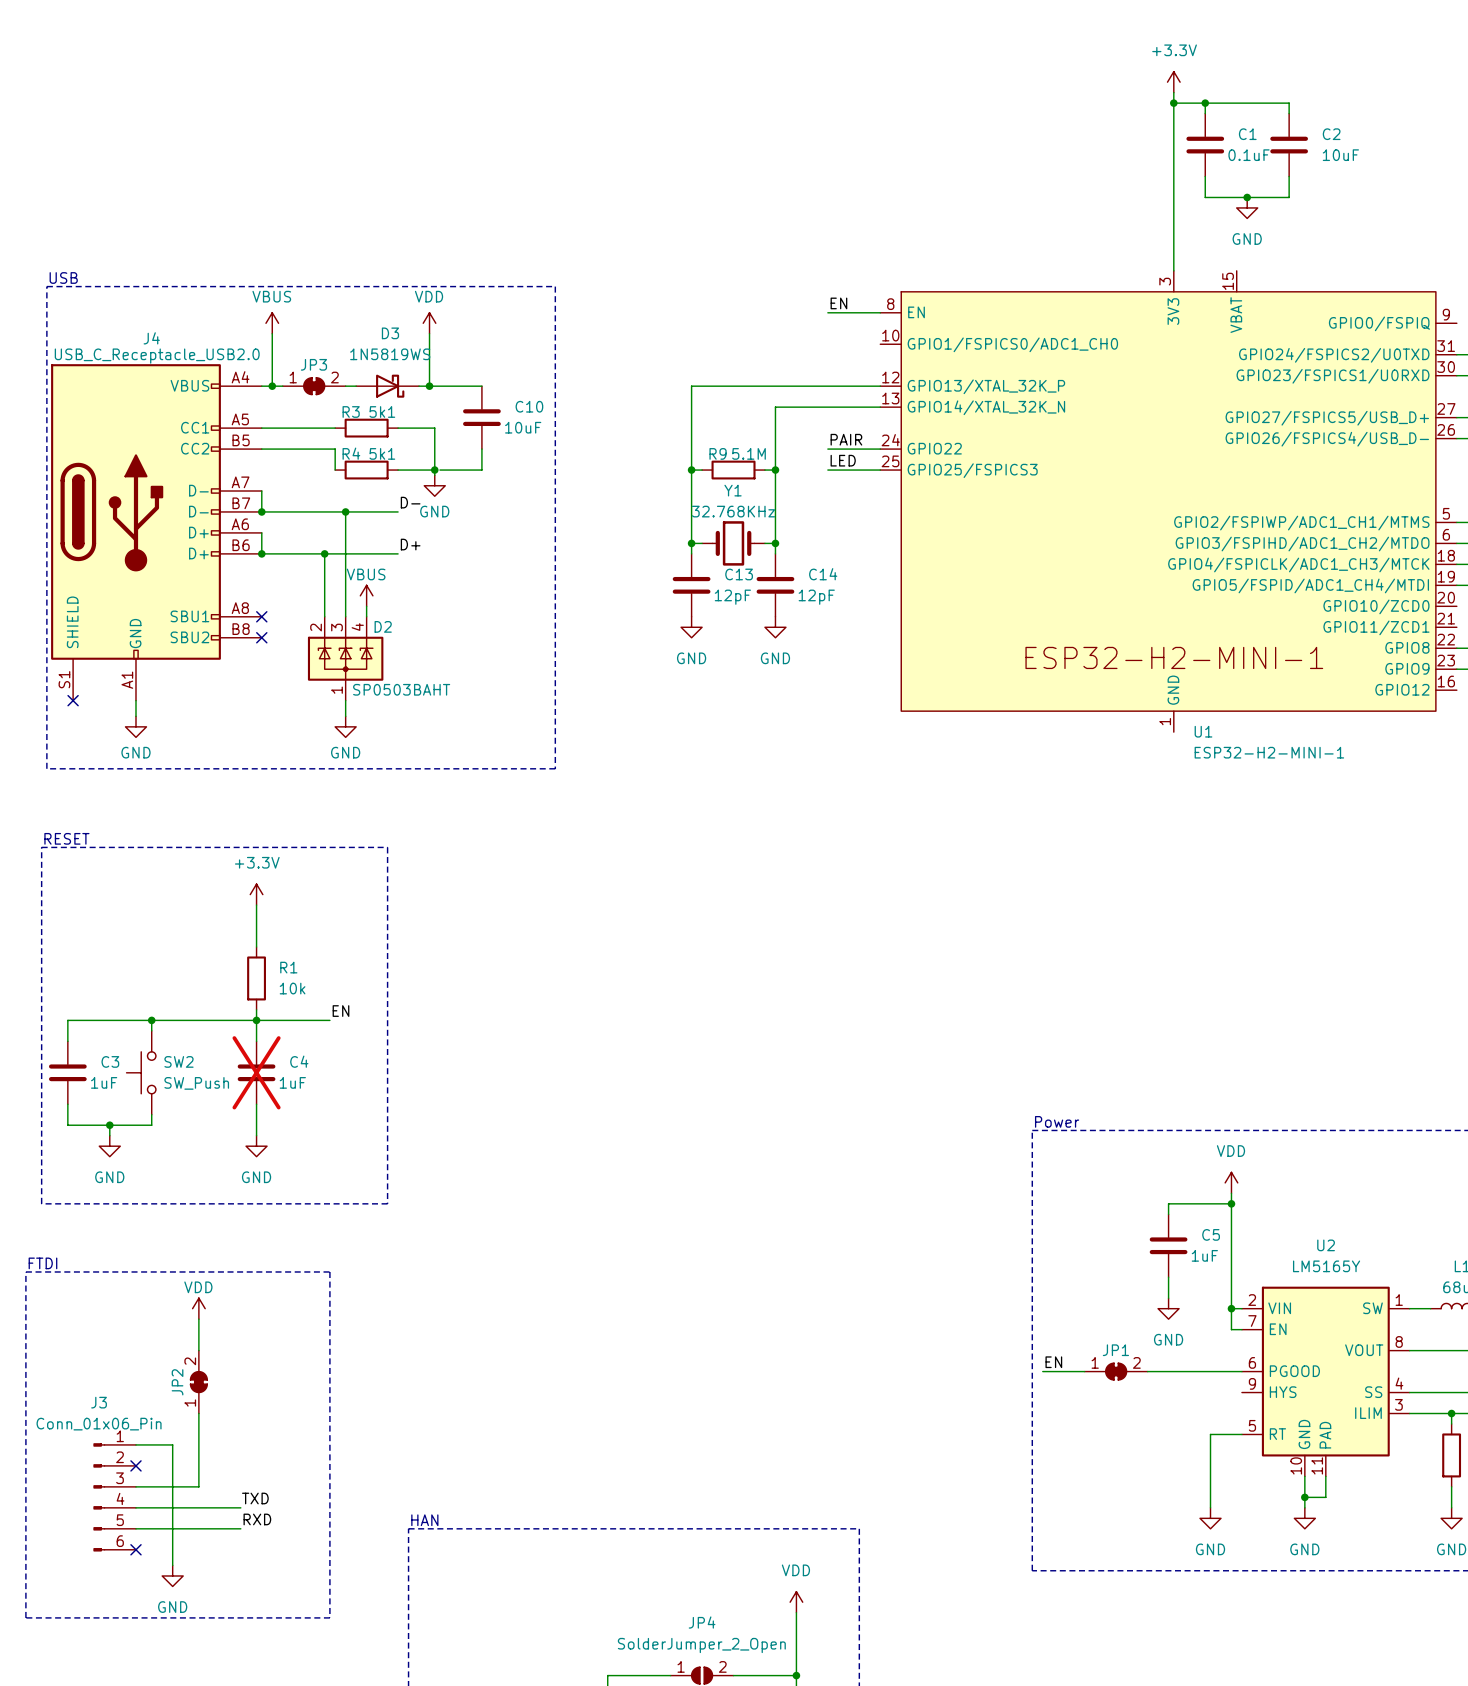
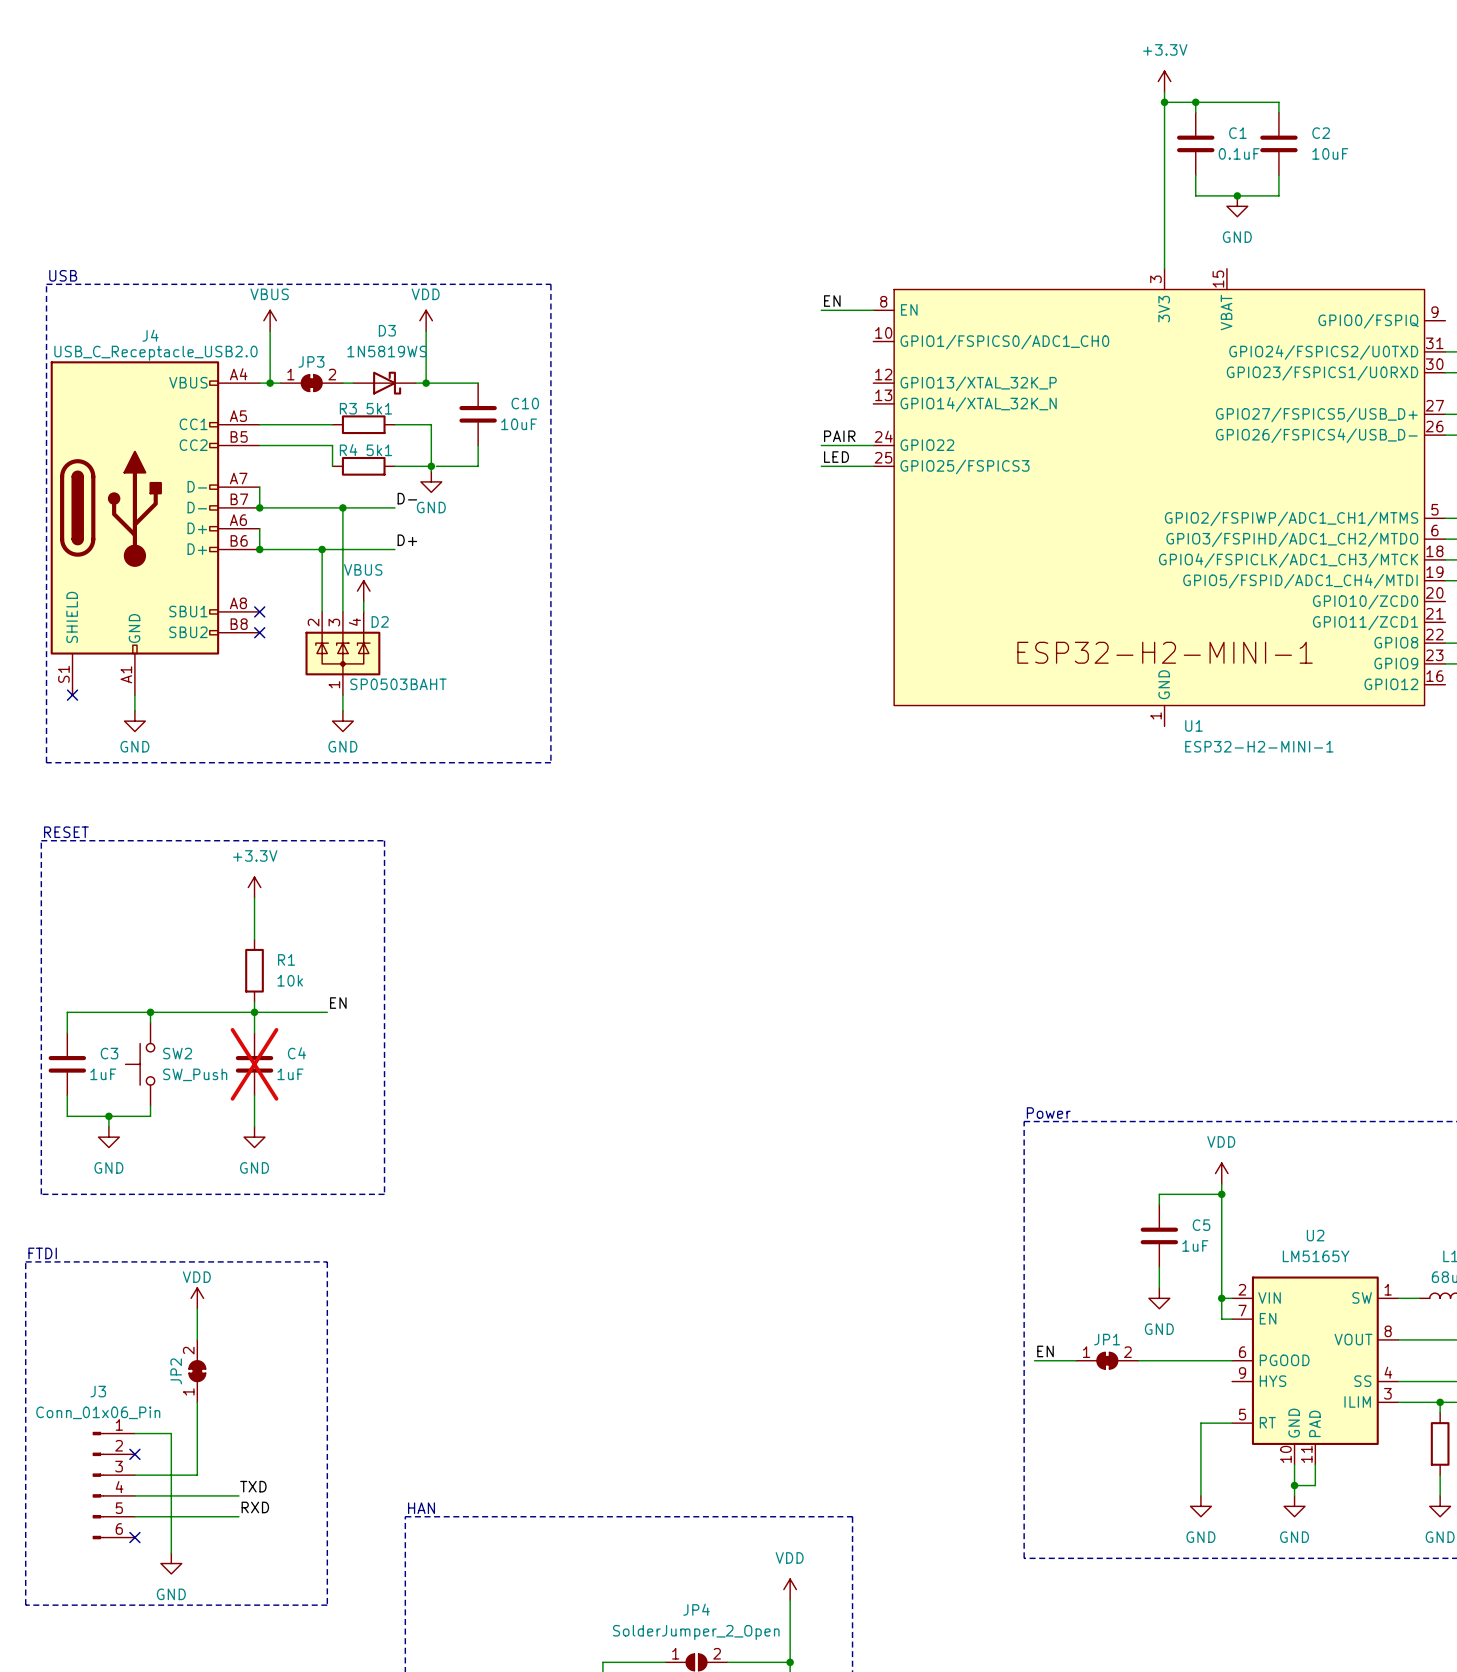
wire: (880, 386) (691, 386) (691, 553) -> none
wire: (880, 407) (775, 407) (775, 553) -> none
wire: (691, 470) (702, 470) -> none
junction: (691, 470) -> none
R9: 5.1M (733, 470) -> none
wire: (764, 470) (775, 470) -> none
junction: (775, 470) -> none
wire: (691, 543) (702, 543) -> none
junction: (691, 543) -> none
Y1: 32.768KHz (733, 543) -> none
wire: (764, 543) (775, 543) -> none
junction: (775, 543) -> none
C13: 12pF (691, 585) -> none
C14: 12pF (775, 585) -> none
power symbol: GND (691, 627) -> none
power symbol: GND (775, 627) -> none

